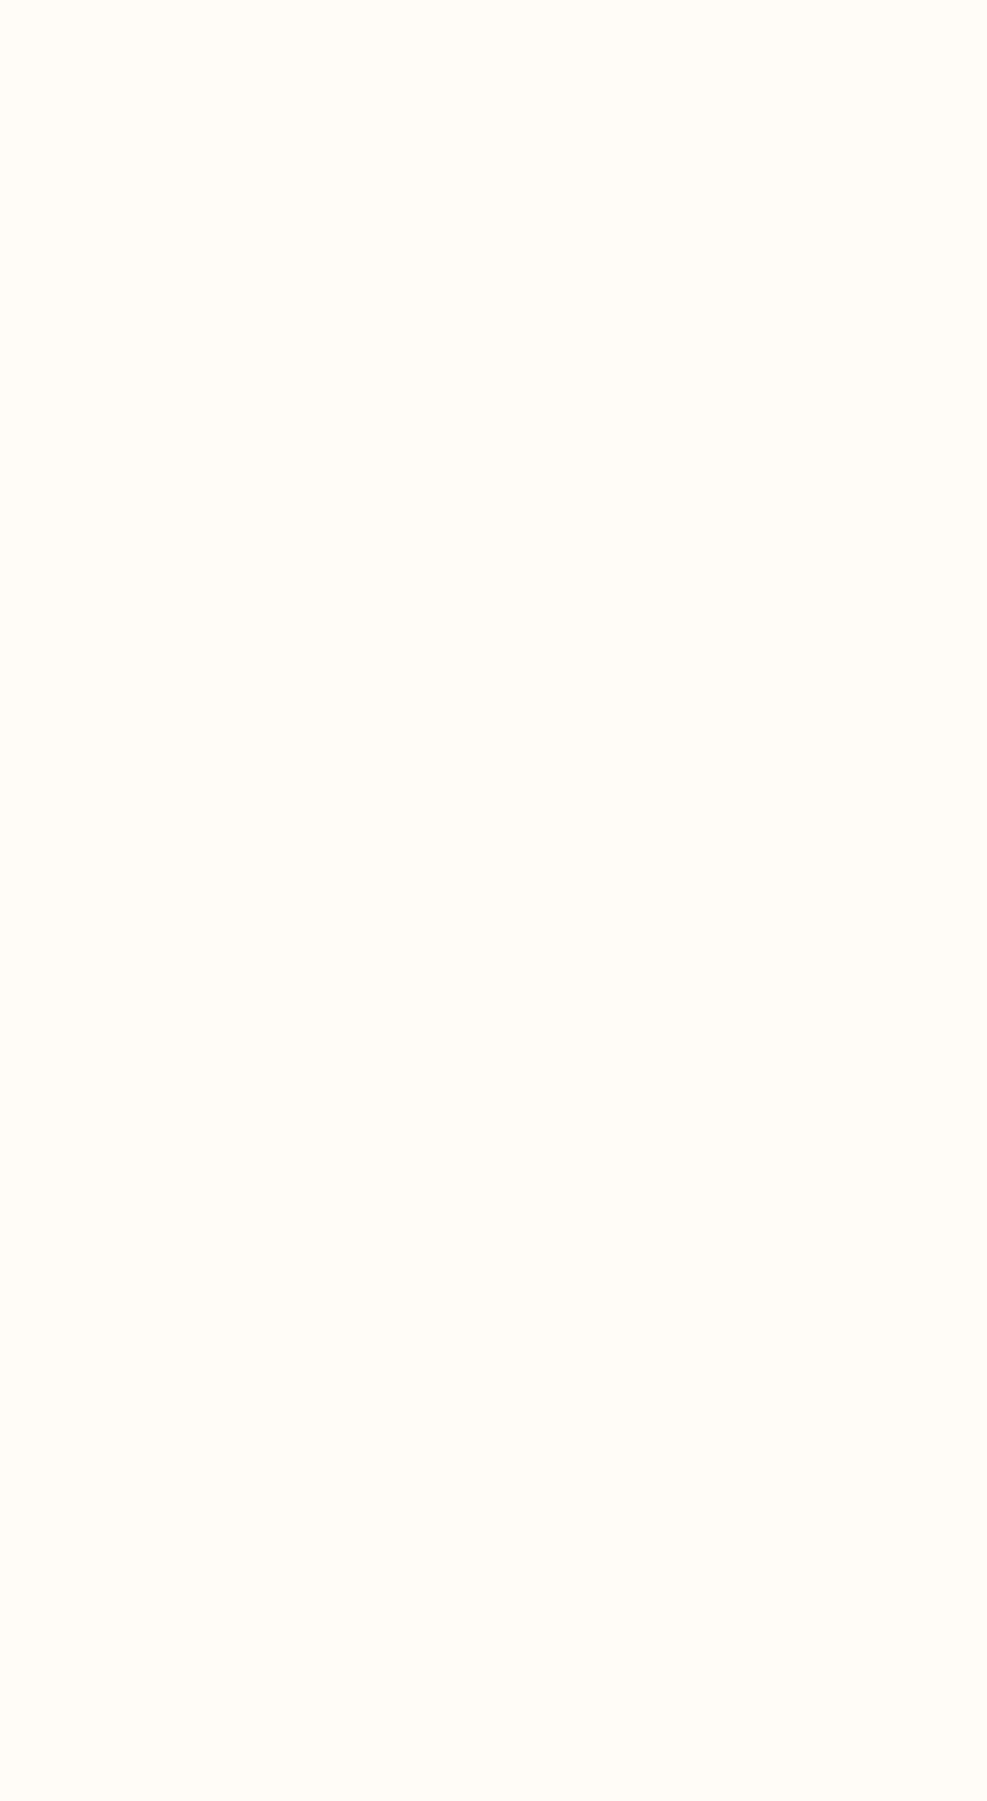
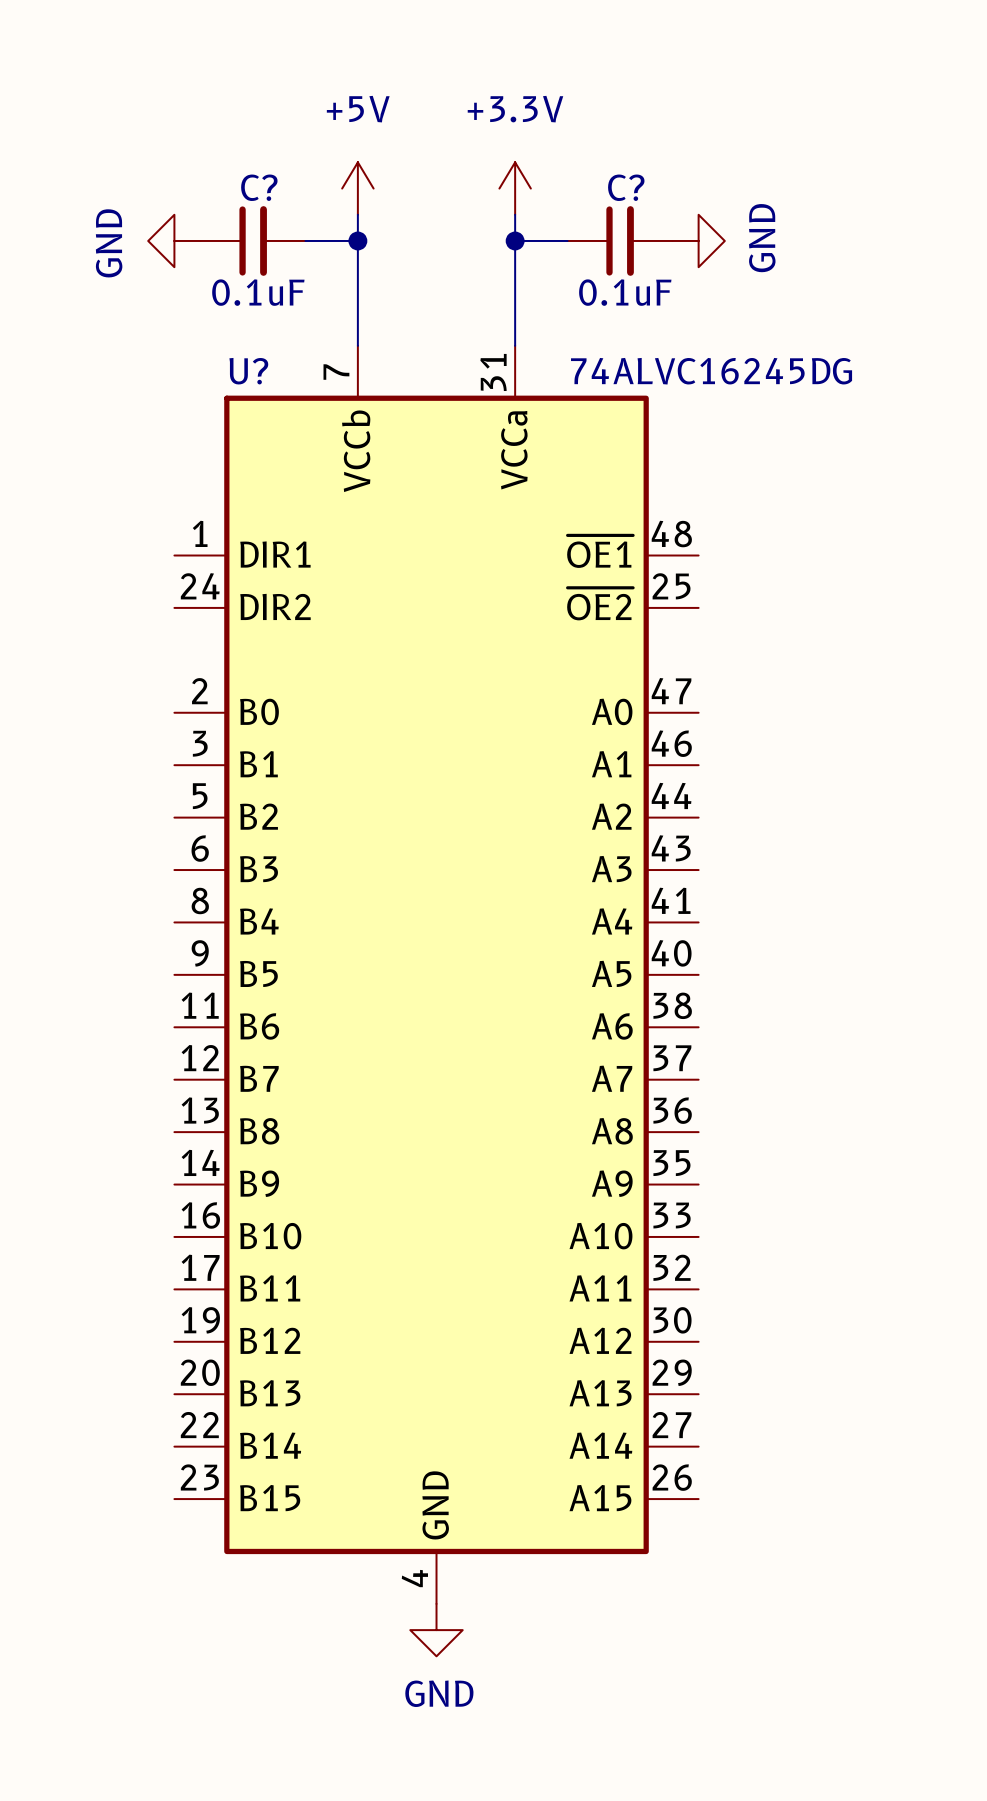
power symbol: none -> +5V (357, 188)
power symbol: none -> +3.3V (515, 188)
wire: none -> (357, 214) (357, 345)
wire: none -> (515, 214) (515, 345)
power symbol: none -> GND (174, 240)
C?: none -> 0.1uF (253, 240)
wire: none -> (305, 240) (357, 240)
junction: none -> (357, 240)
wire: none -> (515, 240) (567, 240)
junction: none -> (515, 240)
C?: none -> 0.1uF (619, 240)
power symbol: none -> GND (698, 240)
U?: none -> 74ALVC16245DG (436, 974)
power symbol: none -> GND (436, 1630)

